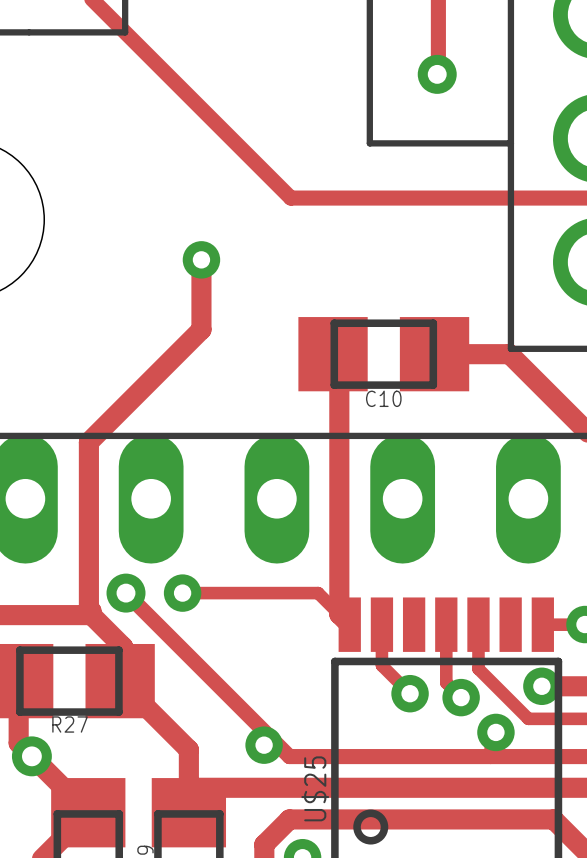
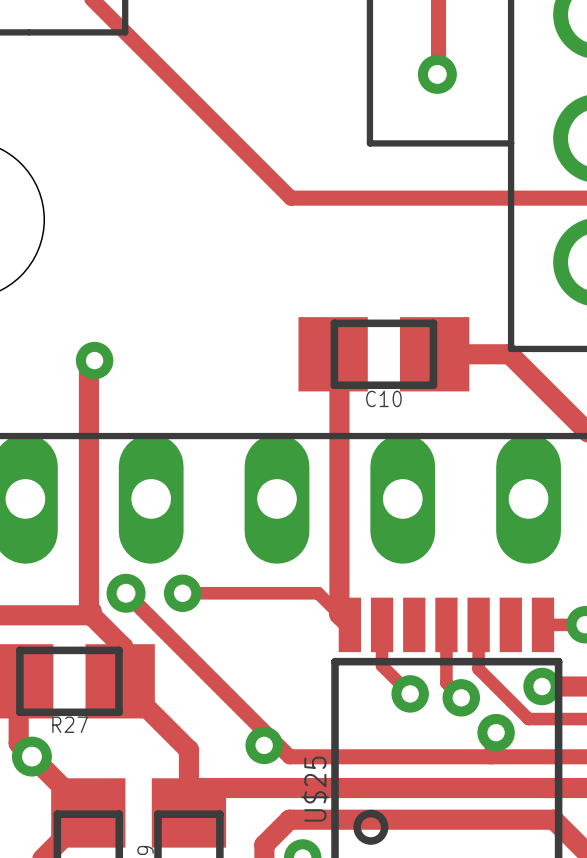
track: (201, 259) (201, 329) (88, 442) -> (94, 360) (88, 366) (88, 442)
via position: (201, 259) -> (94, 360)

